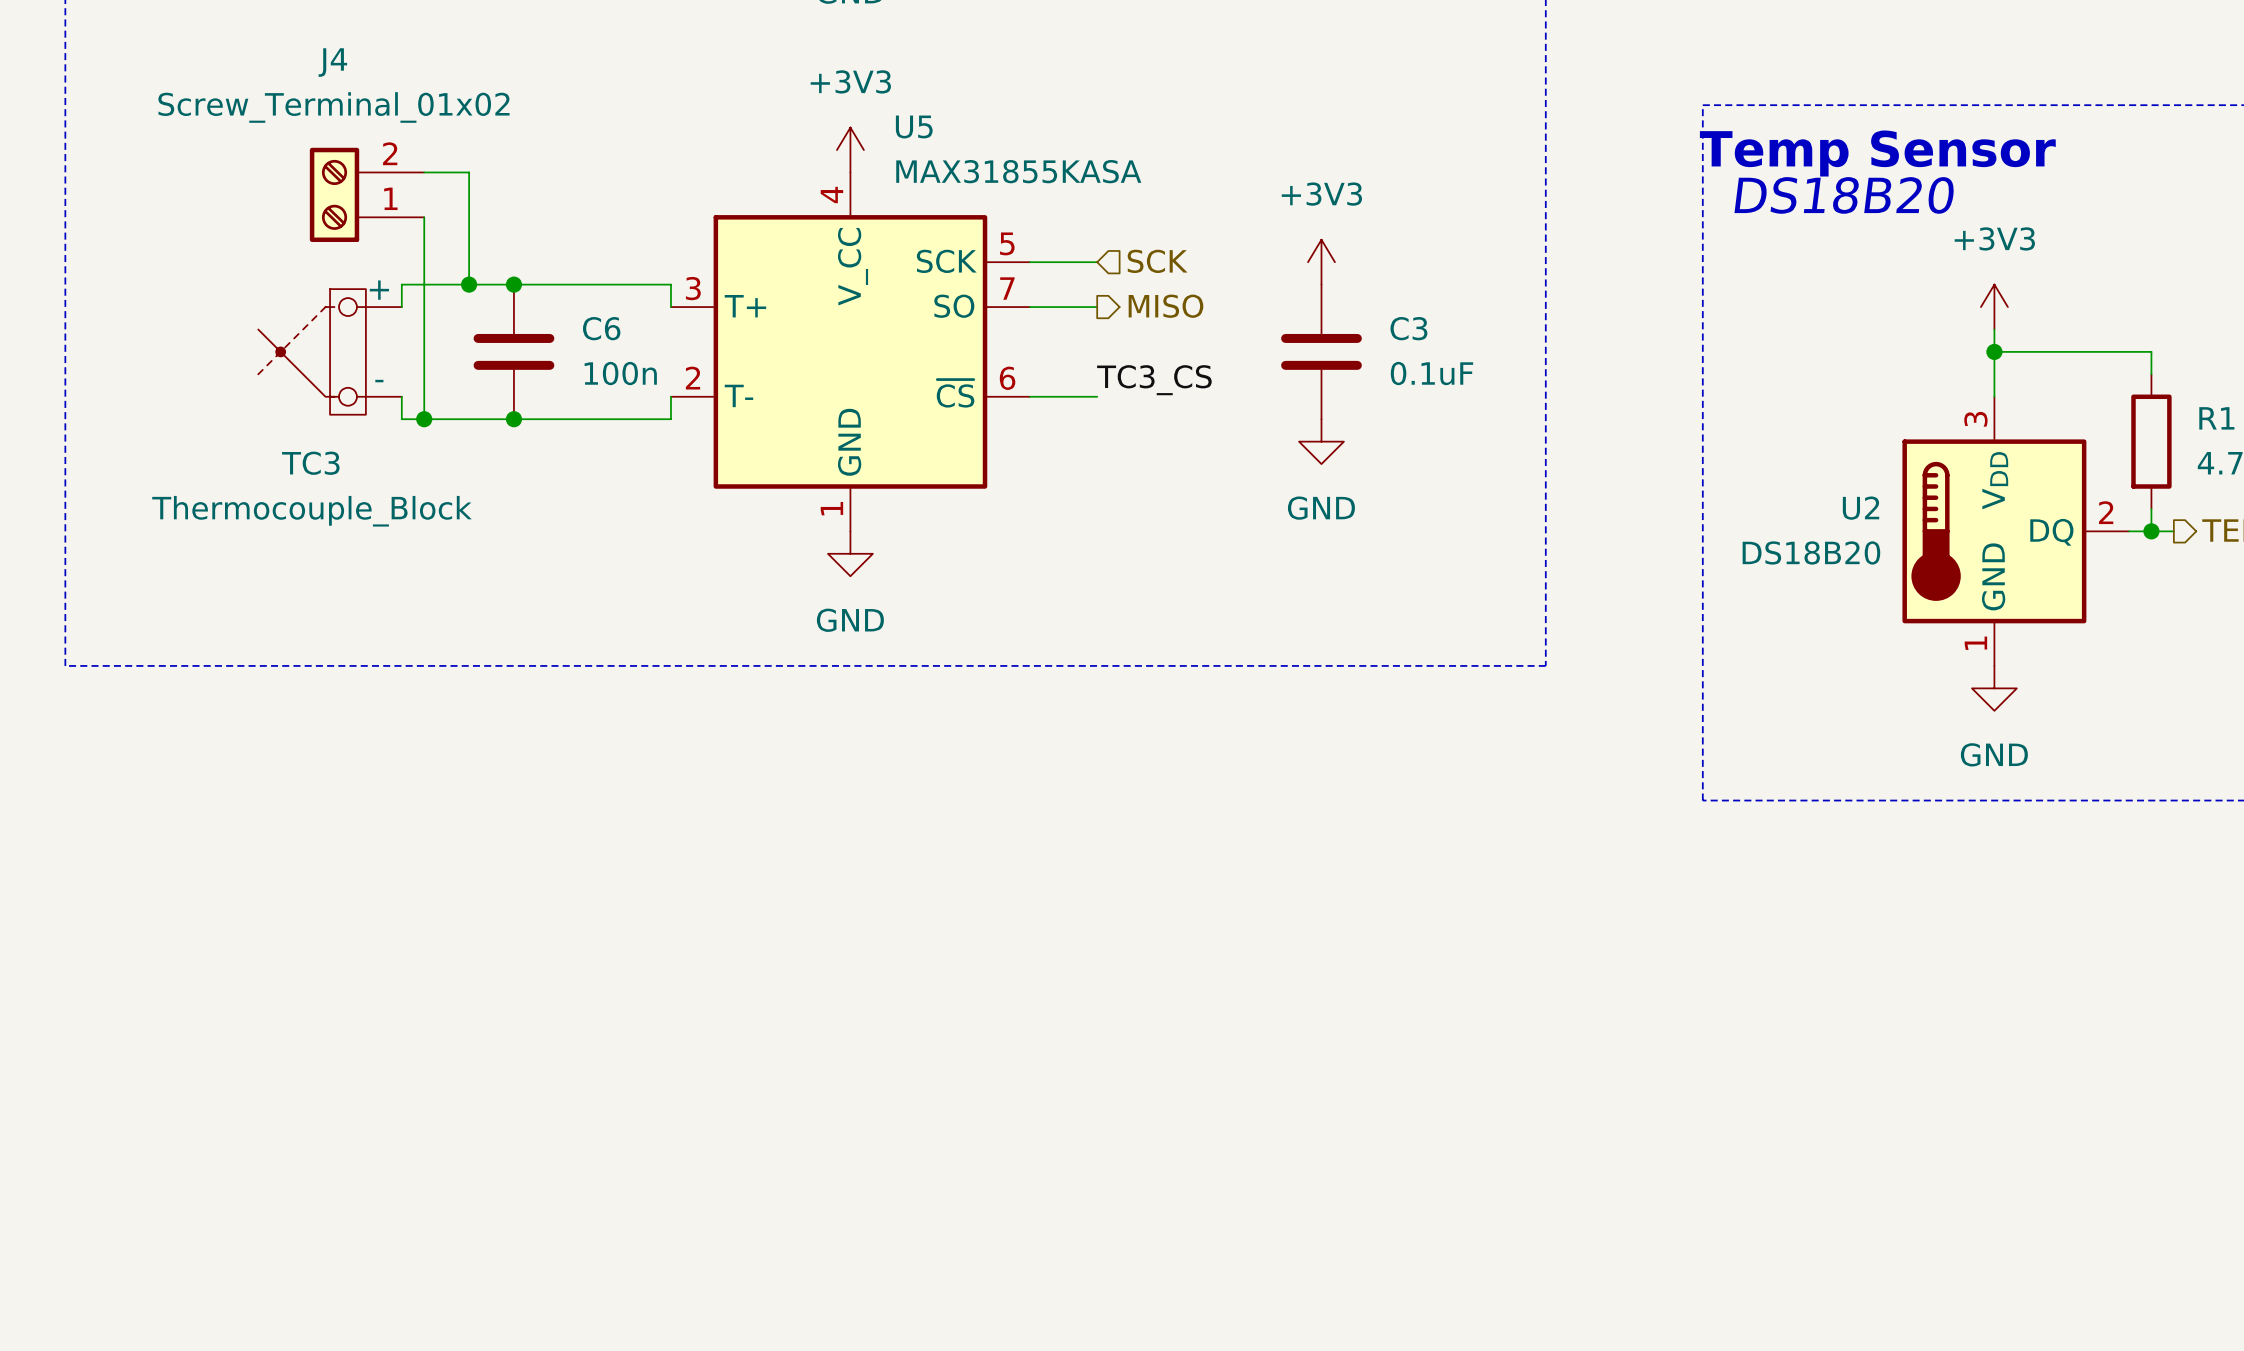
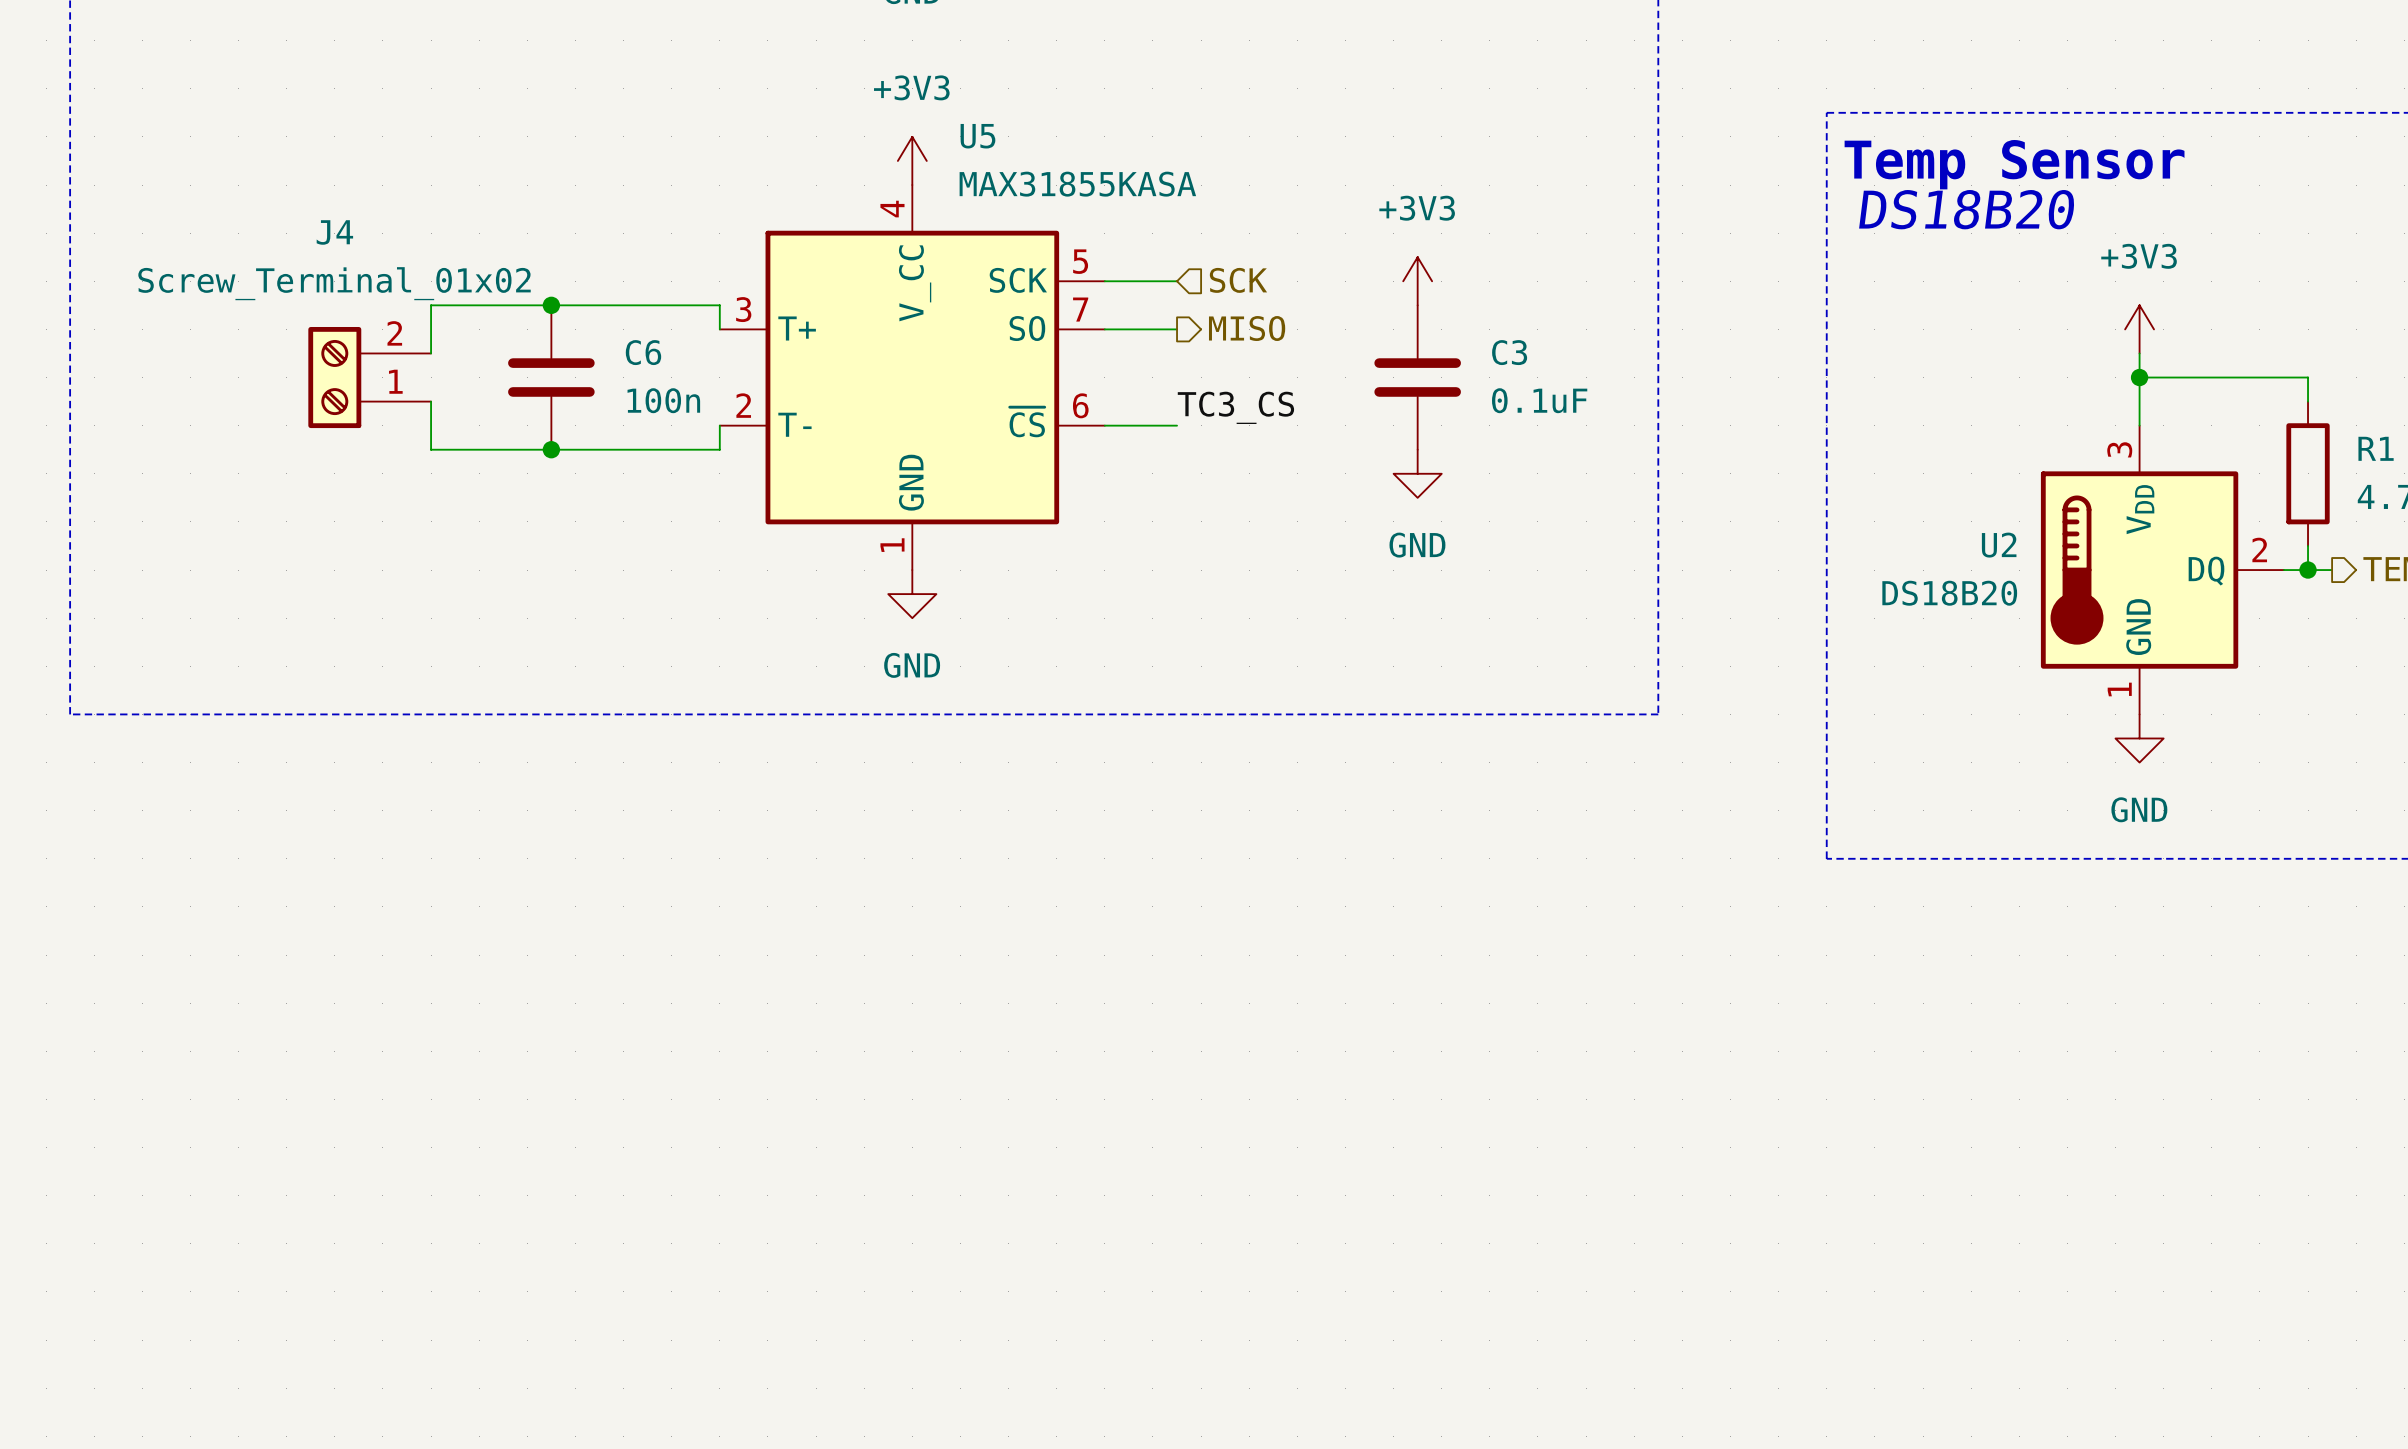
wire: (424, 172) (469, 172) (469, 284) -> none
J4 position: (367, 194) -> (369, 377)
wire: (424, 217) (424, 419) -> none
junction: (469, 284) -> none
wire: none -> (431, 329) (431, 353)
TC3: Thermocouple_Block (330, 351) -> none
wire: none -> (431, 401) (431, 425)
junction: (424, 419) -> none

